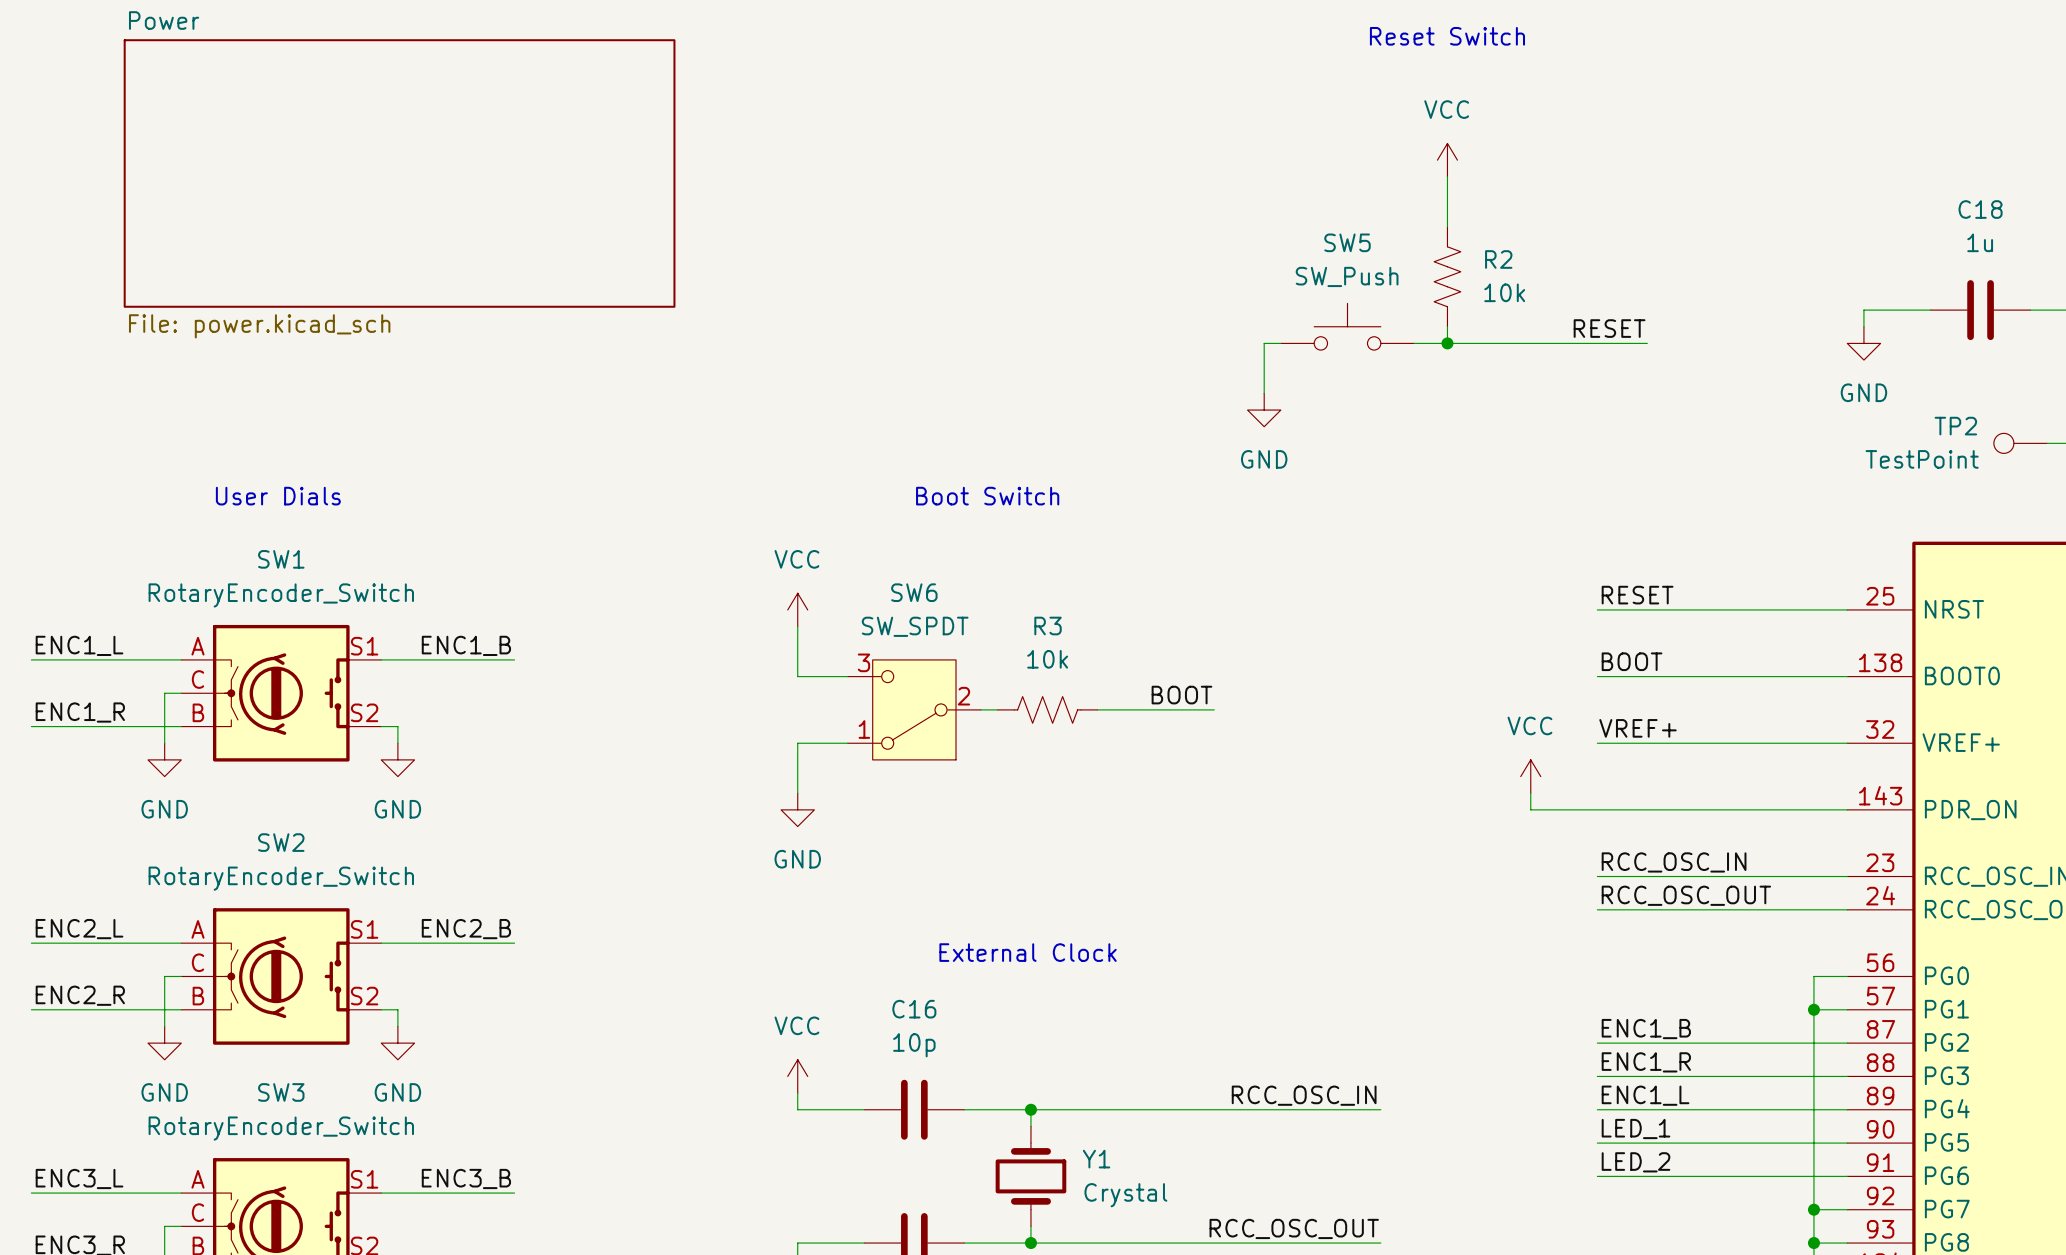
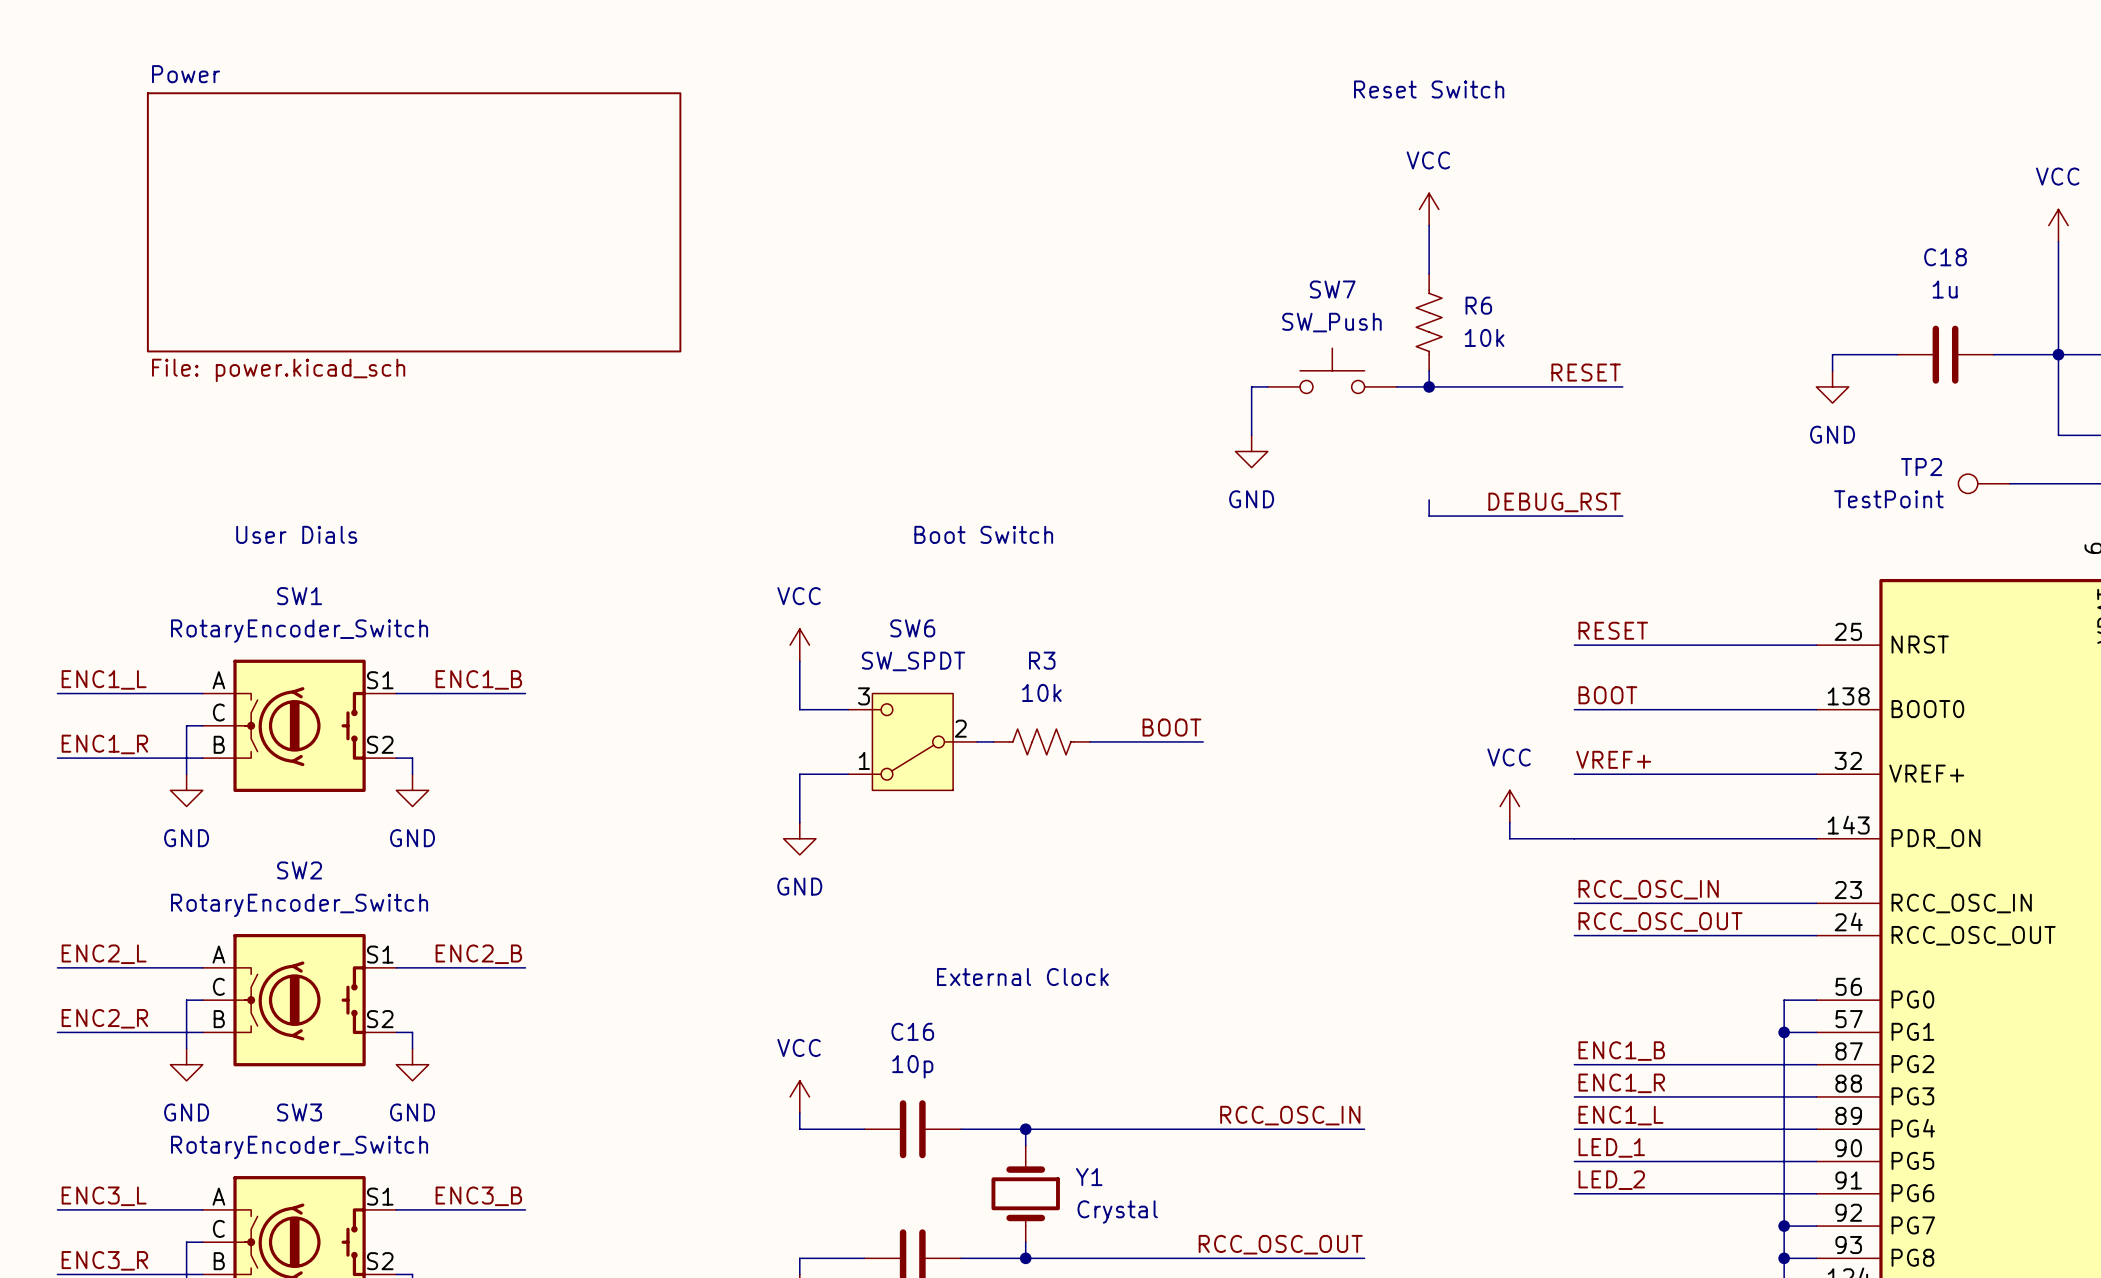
SW5 name: SW5 (1347, 242) -> SW7 (1332, 289)
R2 name: R2 (1498, 259) -> R6 (1478, 305)
wire: none -> (1429, 499) (1429, 516) (1622, 516)
label: none -> DEBUG_RST (1554, 502)

